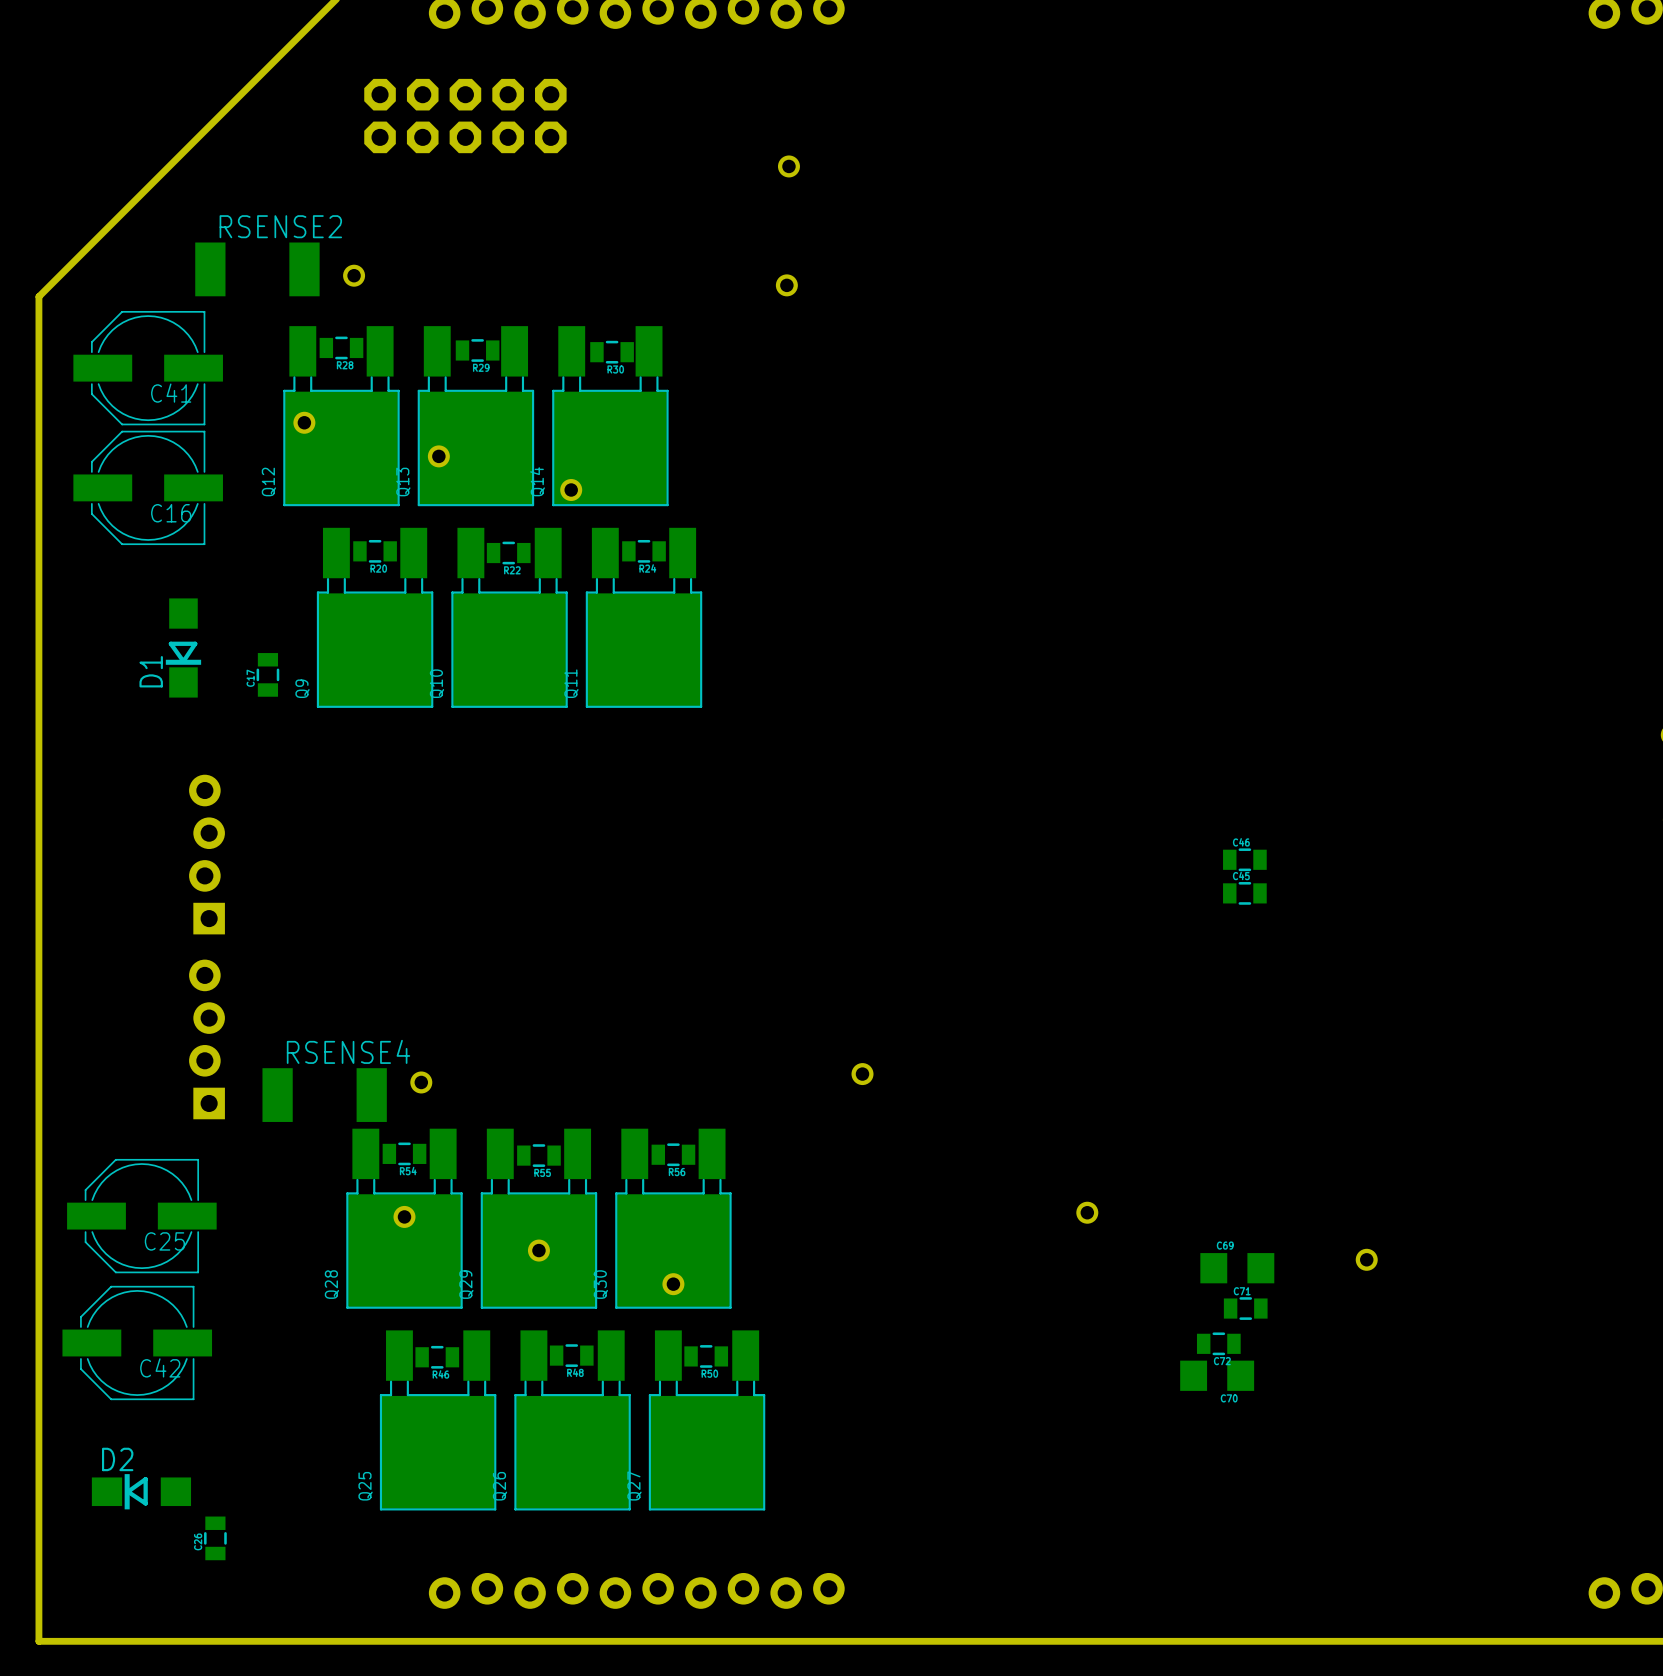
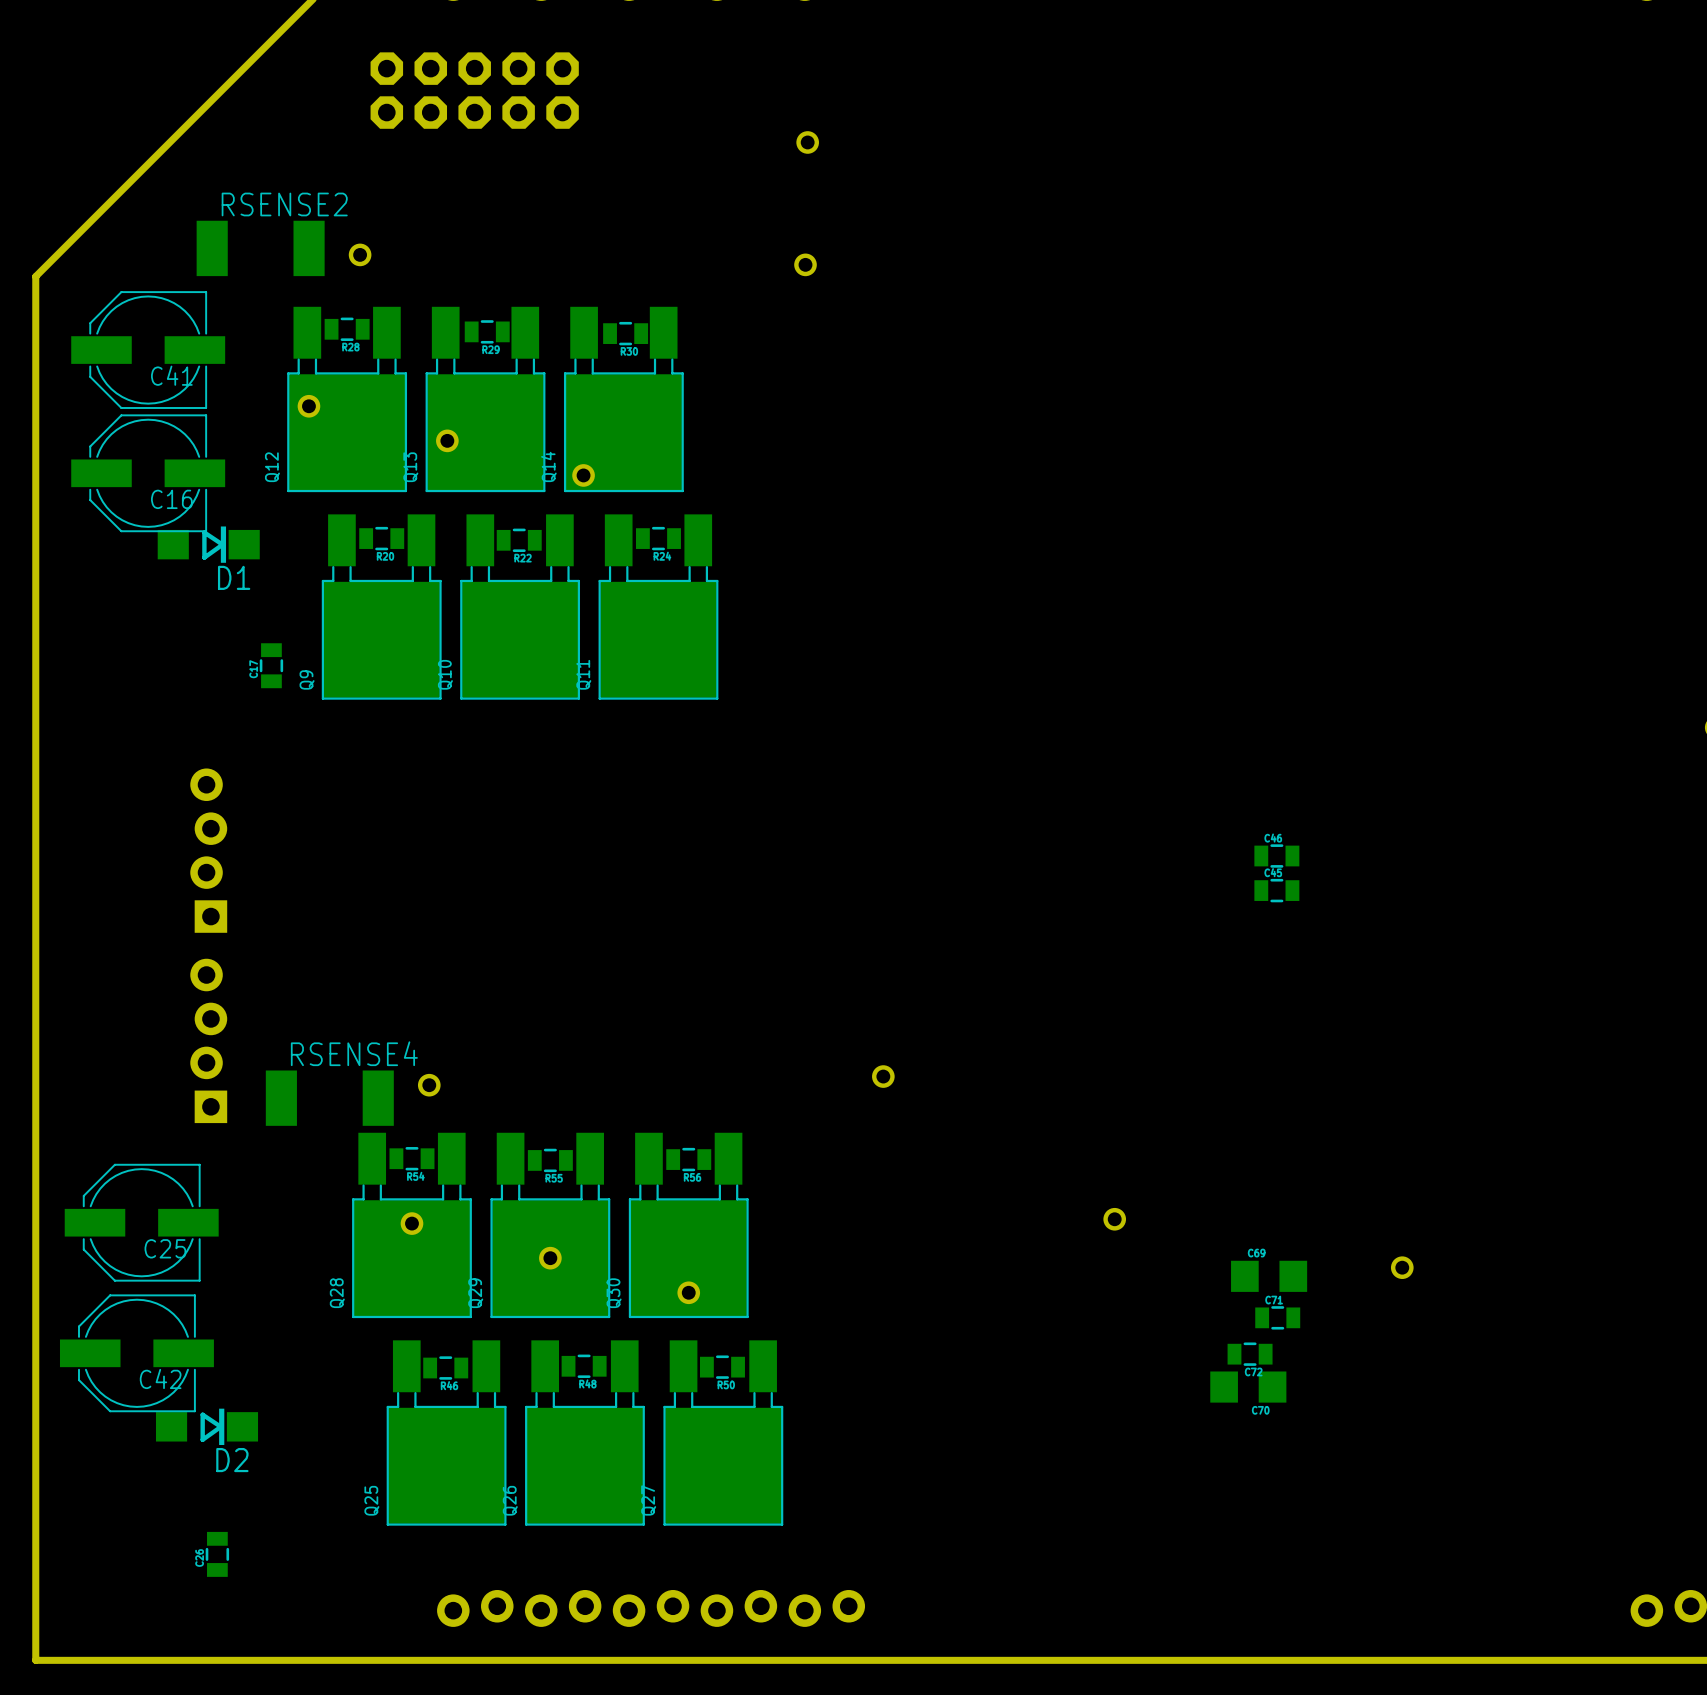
D1 rotation: 0° (183, 647) -> 90° counterclockwise (208, 544)
D1 position: (183, 647) -> (208, 544)
D2 rotation: 0° (141, 1491) -> 180° (207, 1426)
D2 position: (141, 1491) -> (207, 1426)

